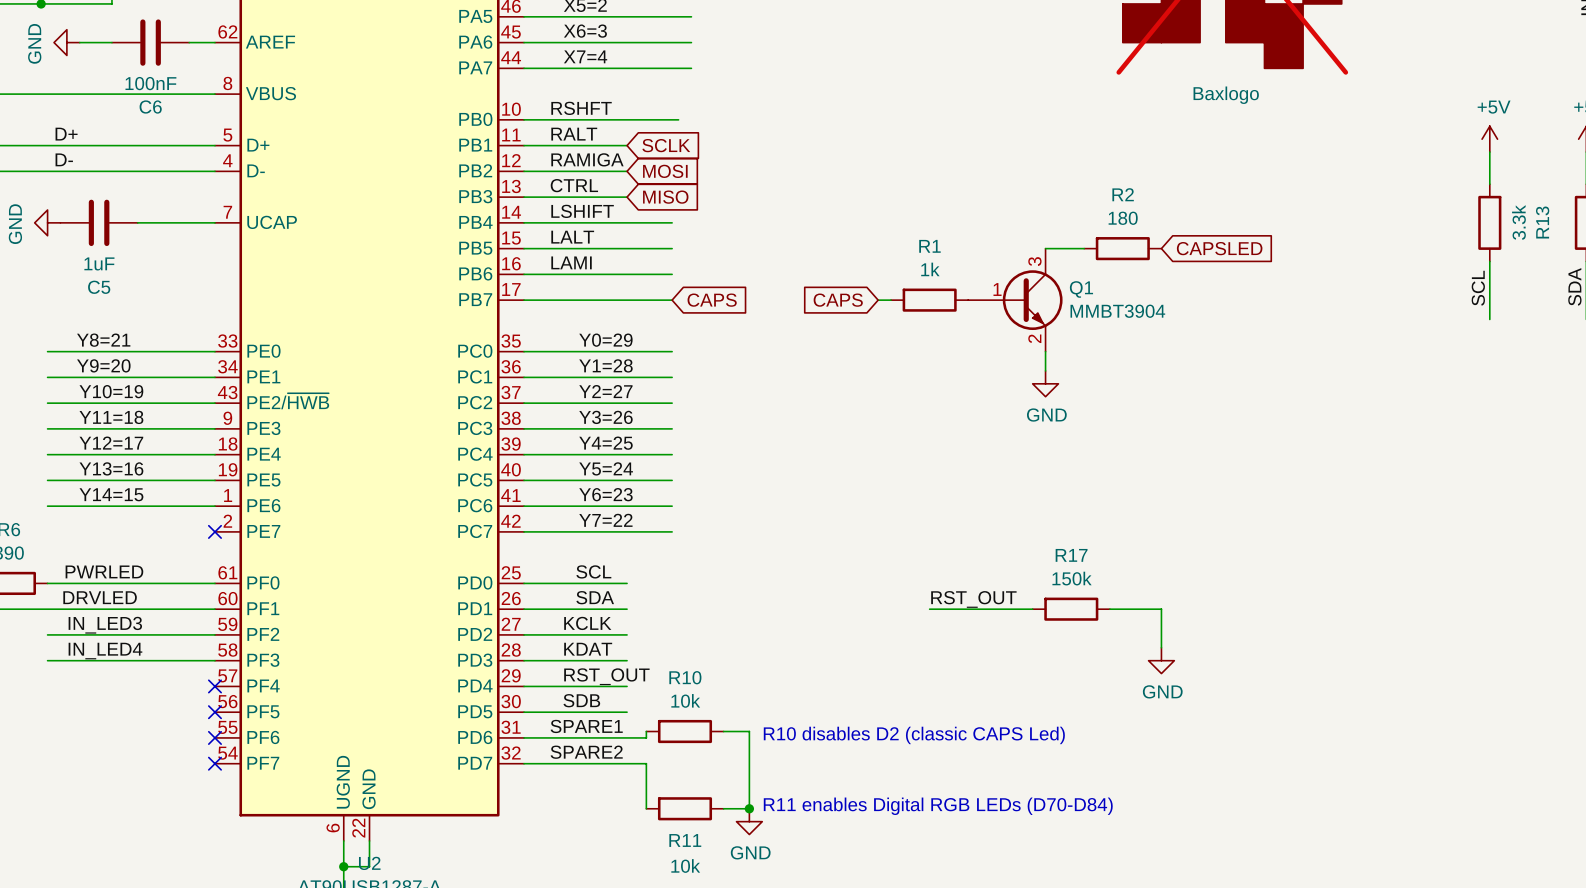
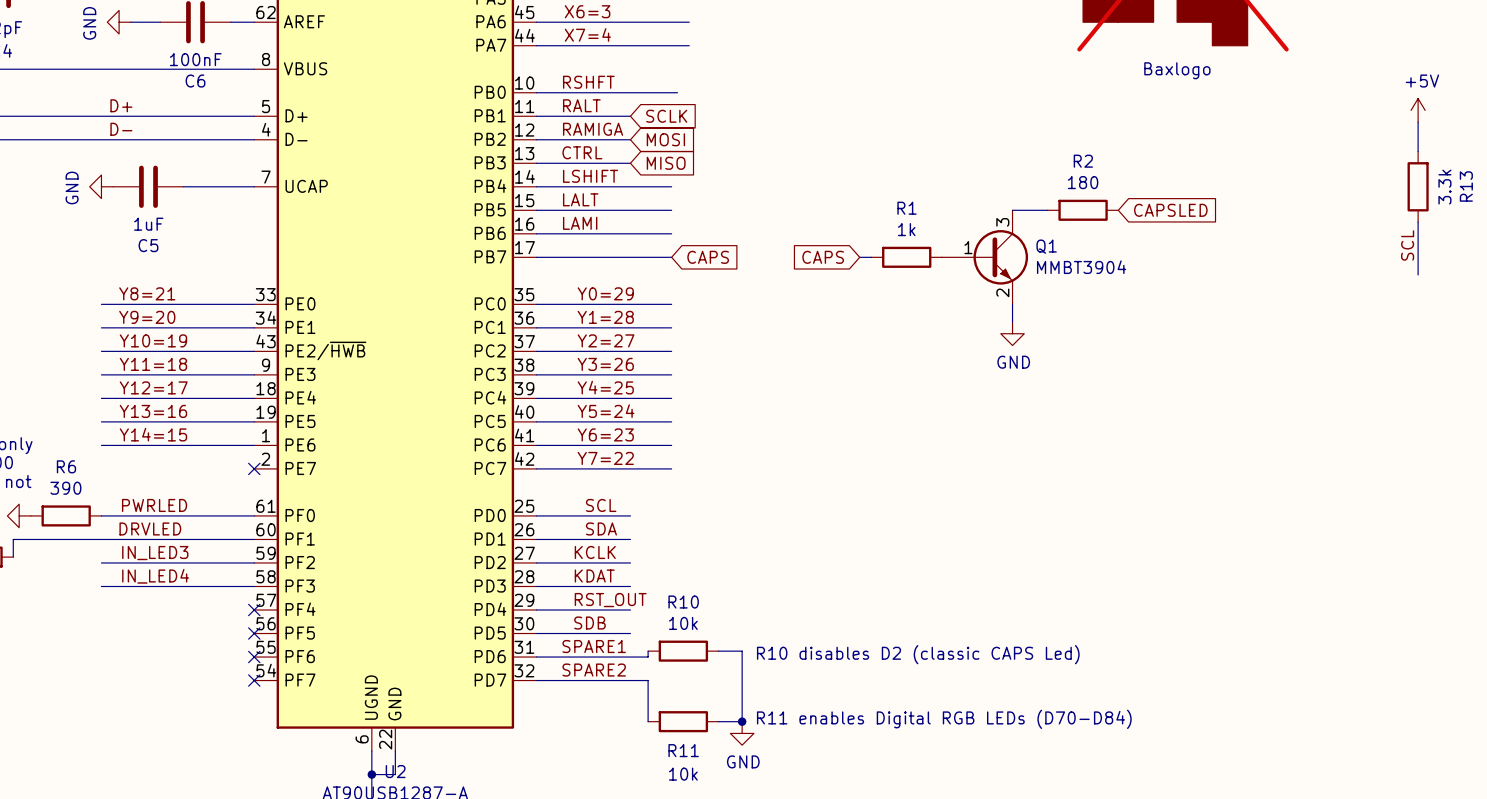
label: RST_OUT (973, 599) -> none
wire: (929, 609) (1032, 609) -> none
R17: 150k (1071, 609) -> none
wire: (1109, 609) (1161, 609) (1161, 647) -> none
power symbol: GND (1161, 660) -> none

